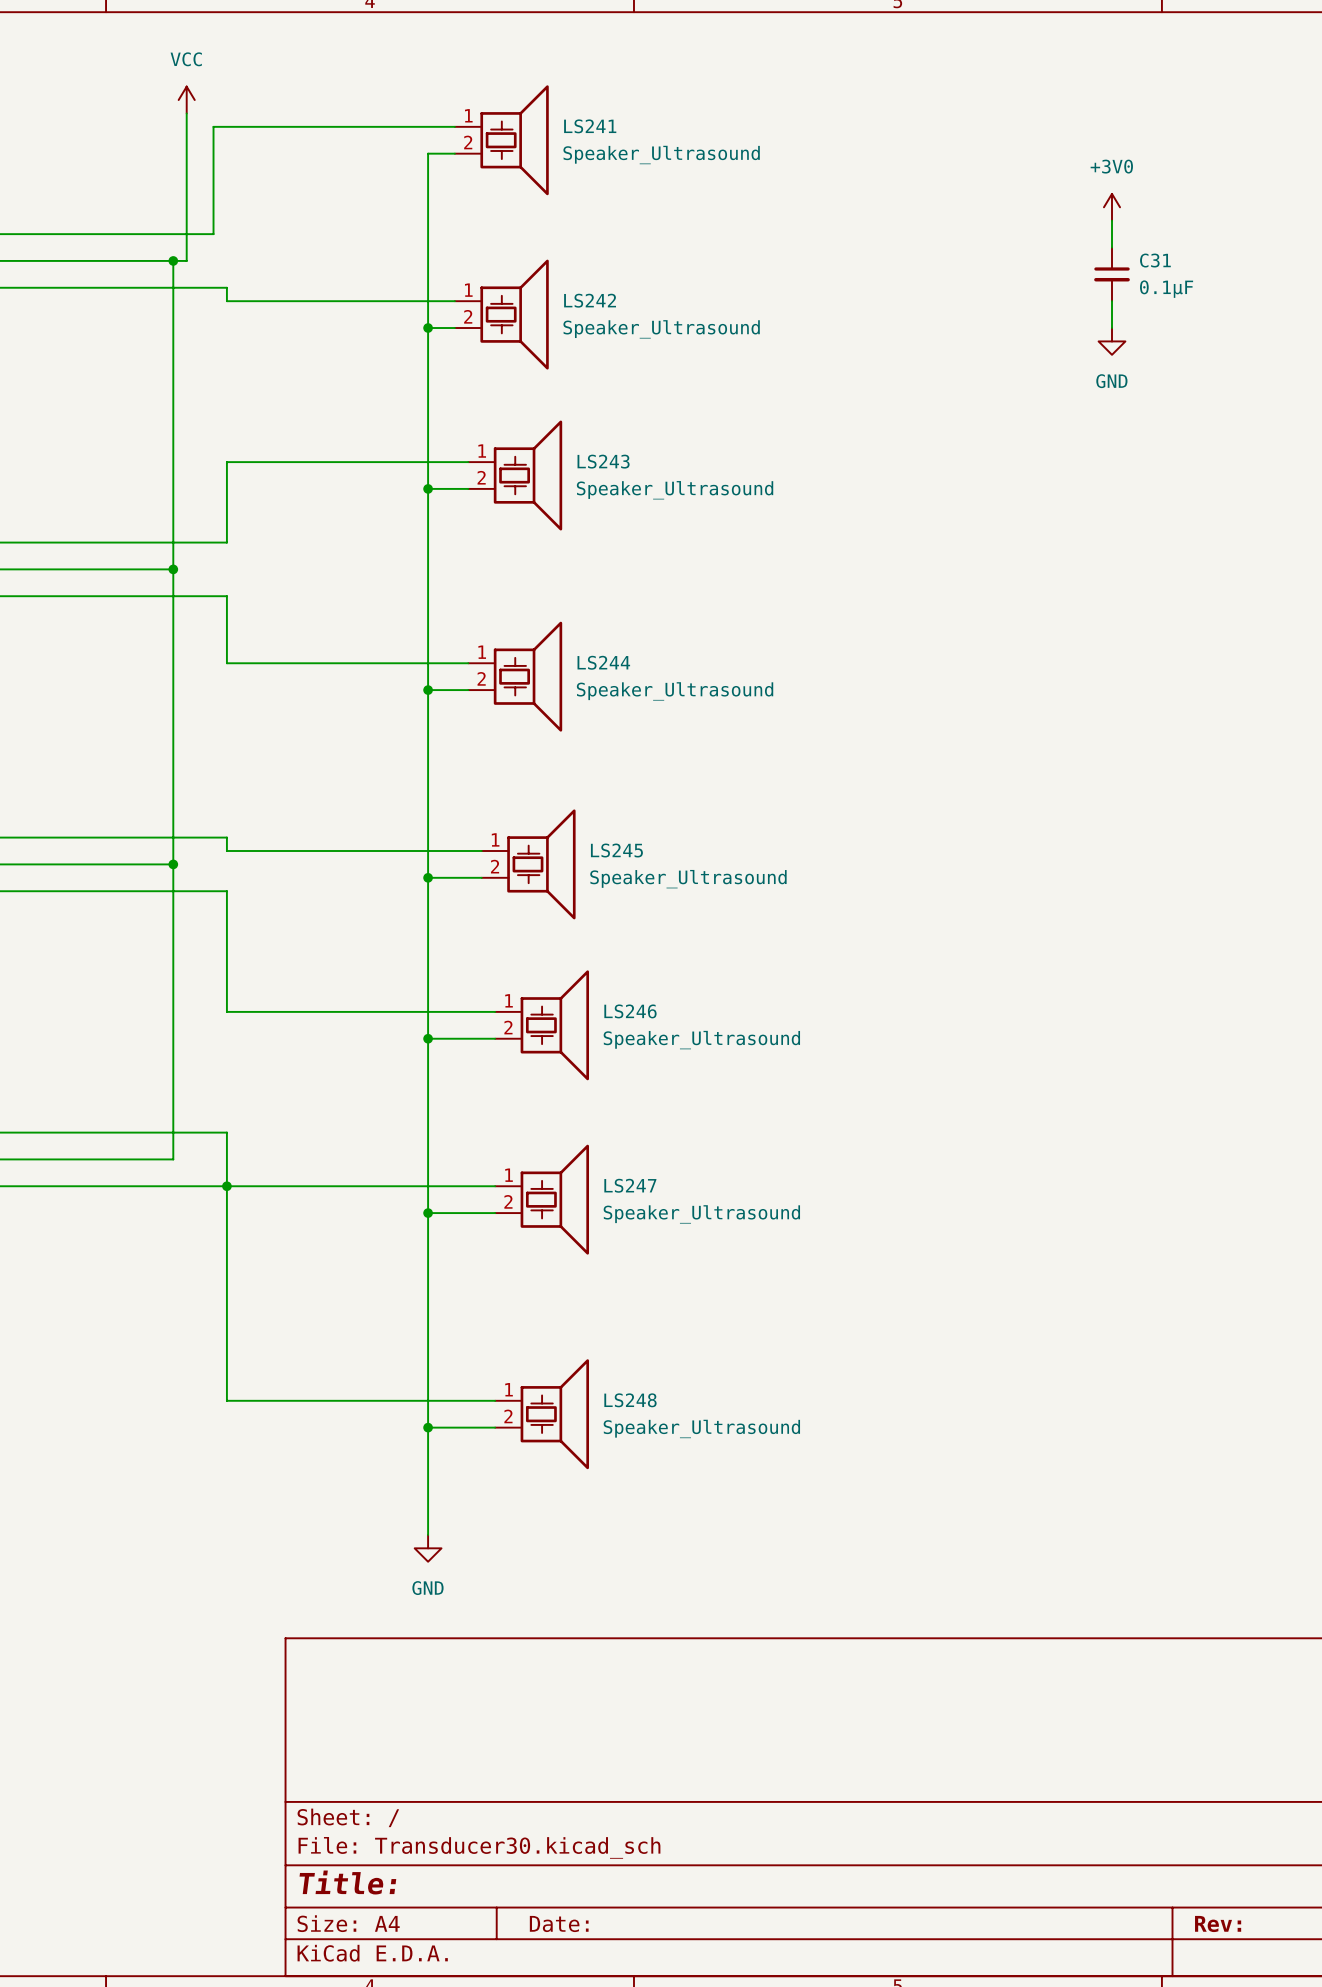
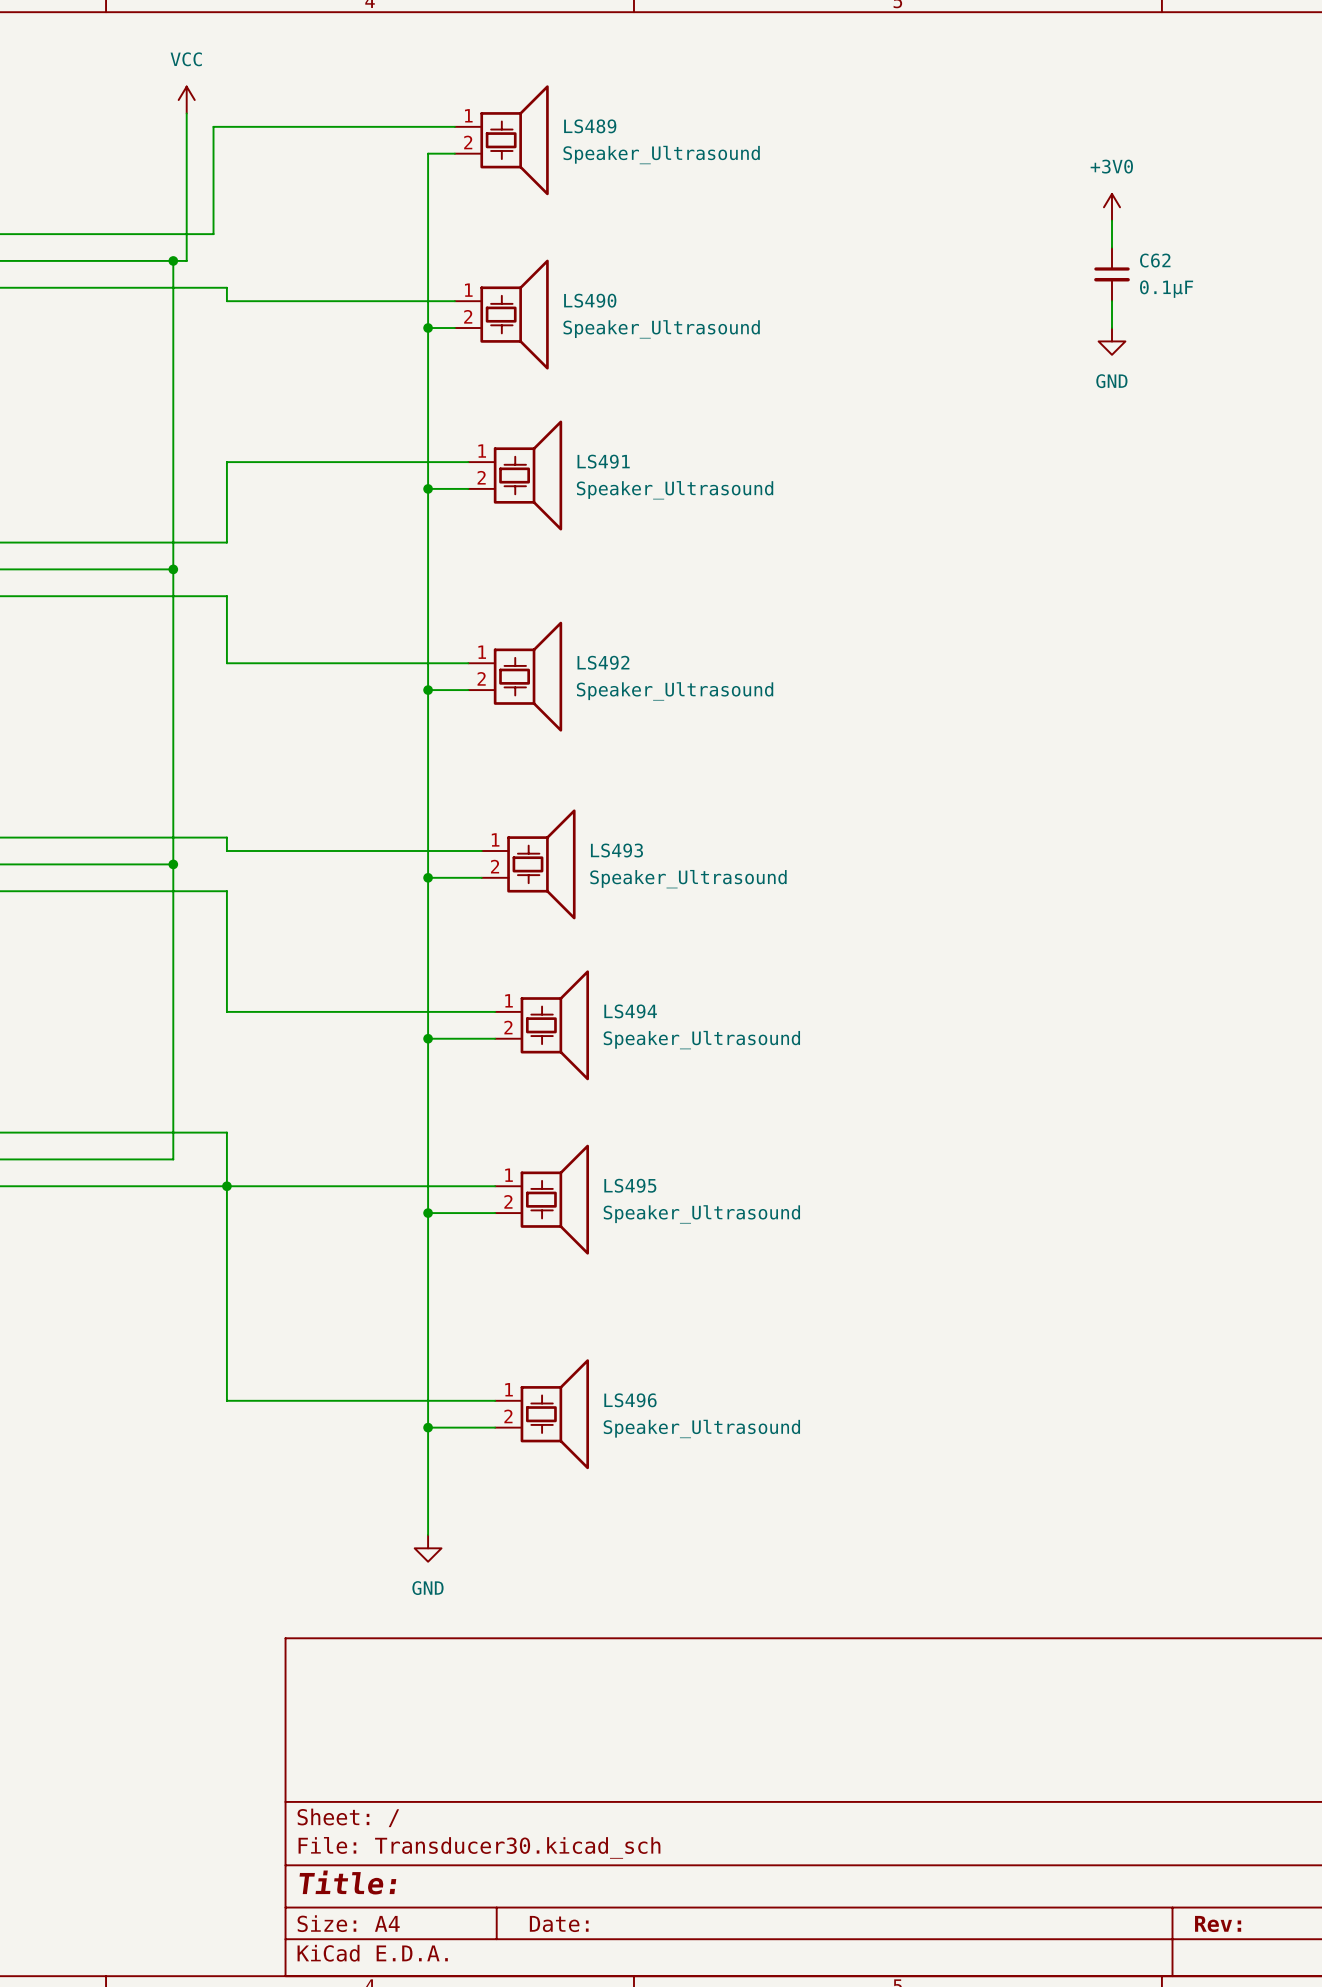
LS241 name: LS241 (590, 126) -> LS489 (590, 126)
C31 name: C31 (1155, 260) -> C62 (1155, 260)
LS242 name: LS242 (590, 300) -> LS490 (590, 300)
LS243 name: LS243 (603, 461) -> LS491 (603, 461)
LS244 name: LS244 (603, 662) -> LS492 (603, 662)
LS245 name: LS245 (616, 850) -> LS493 (616, 850)
LS246 name: LS246 (630, 1011) -> LS494 (630, 1011)
LS247 name: LS247 (630, 1185) -> LS495 (630, 1185)
LS248 name: LS248 (630, 1400) -> LS496 (630, 1400)

